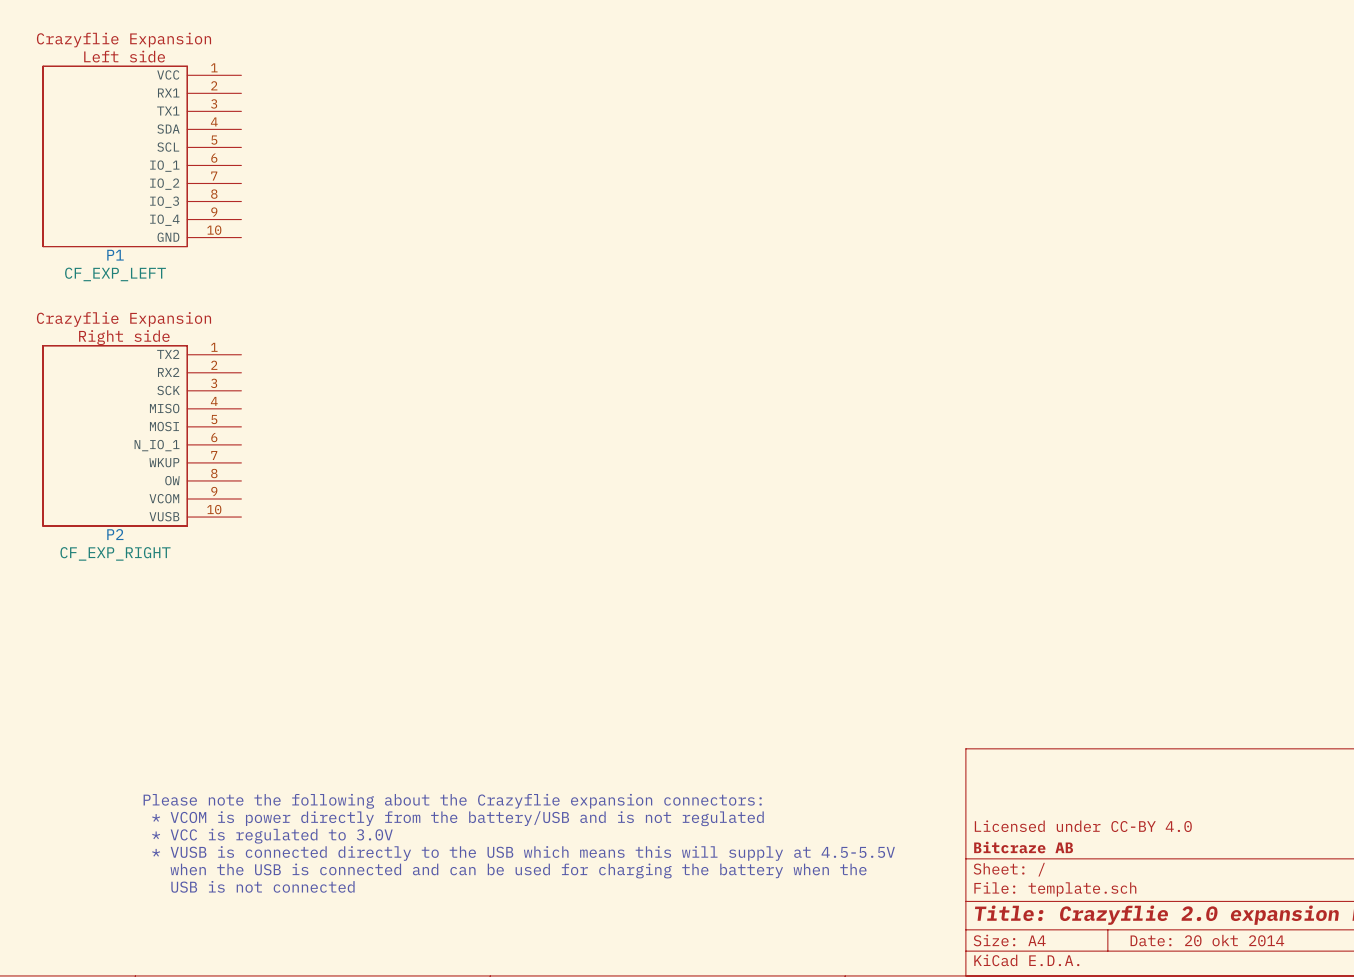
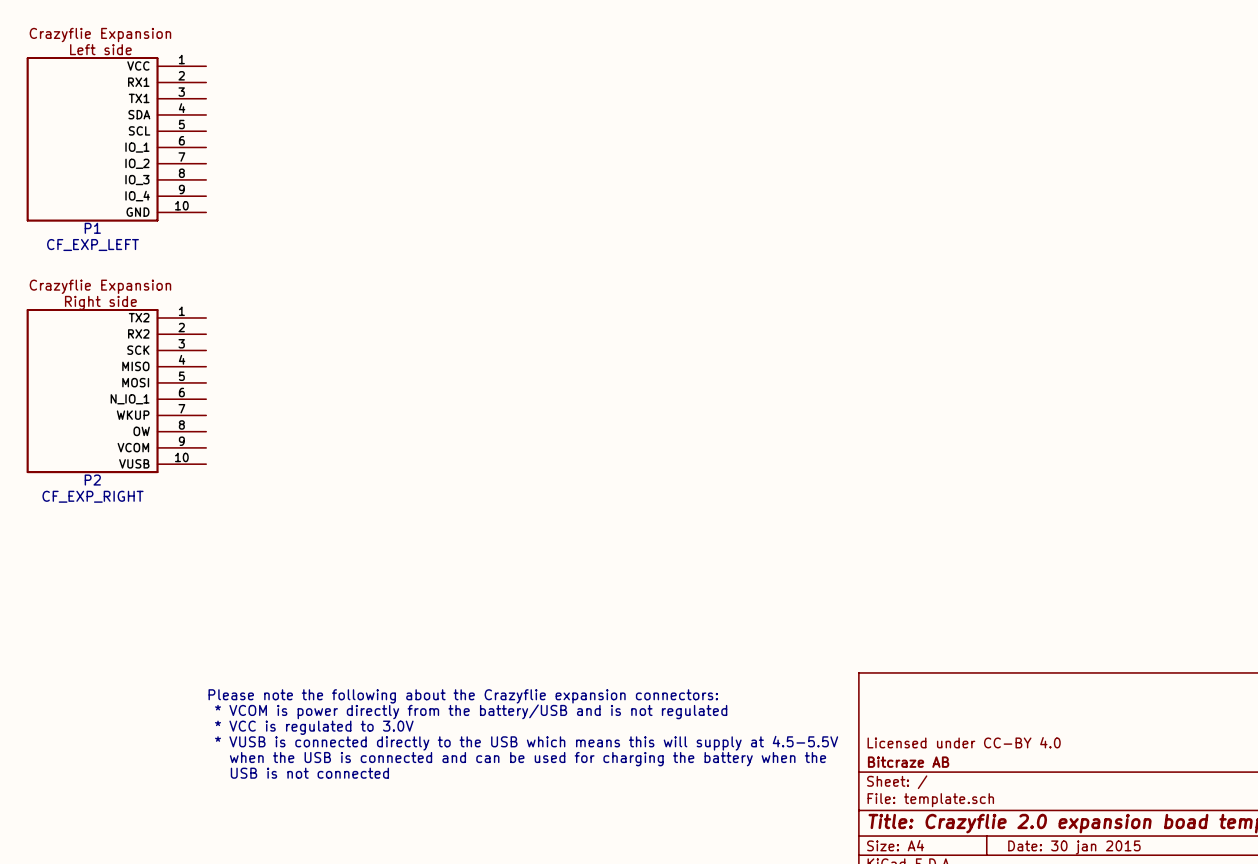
text position: Please note the following about the Crazyflie expansion connectors: (452, 801) -> Please note the following about the Crazyflie expansion connectors: (463, 696)
text position: * VCOM is power directly from the battery/USB and is not regulated (457, 818) -> * VCOM is power directly from the battery/USB and is not regulated (471, 711)
text position: * VCC is regulated to 3.0V (272, 836) -> * VCC is regulated to 3.0V (314, 727)
text position: * VUSB is connected directly to the USB which means this will supply at 4.5-5.5V (523, 853) -> * VUSB is connected directly to the USB which means this will supply at 4.5-5.5V (526, 743)
text position: when the USB is connected and can be used for charging the battery when the (518, 870) -> when the USB is connected and can be used for charging the battery when the (527, 759)
text position: USB is not connected (262, 886) -> USB is not connected (309, 773)
title block: Date: 20 okt 2014 (1207, 940) -> Date: 30 jan 2015 (1074, 847)

